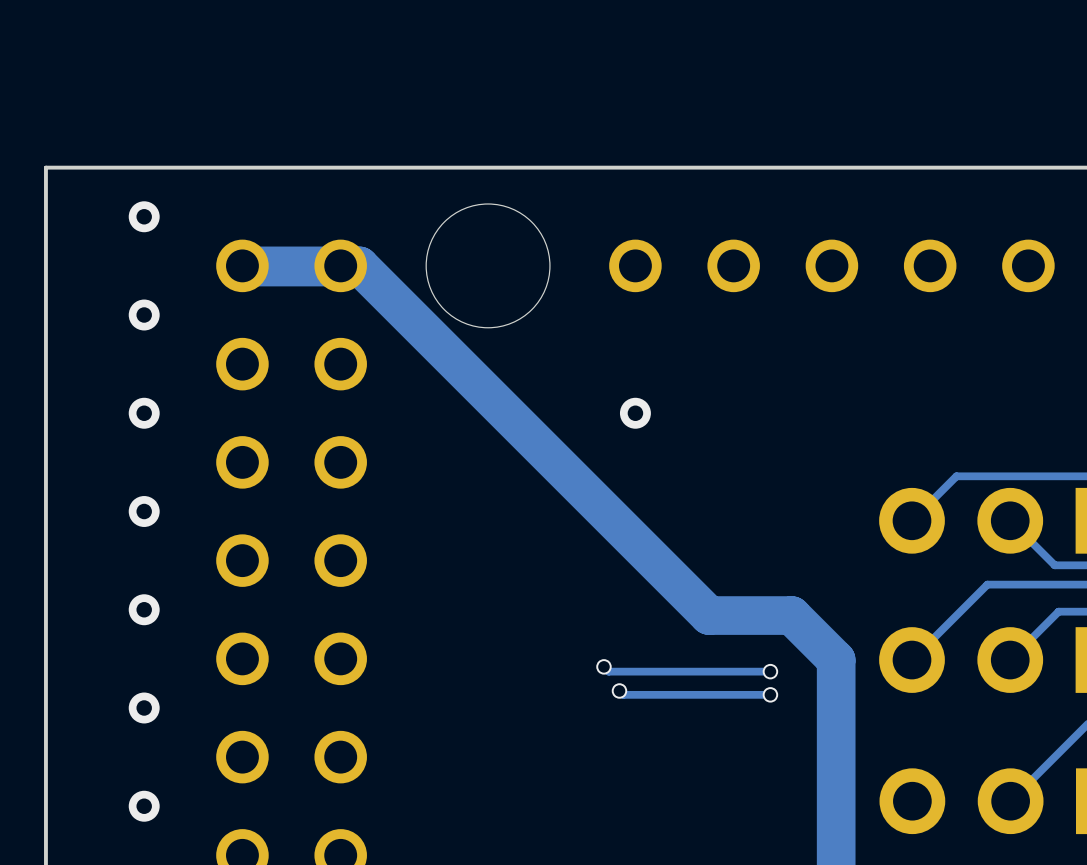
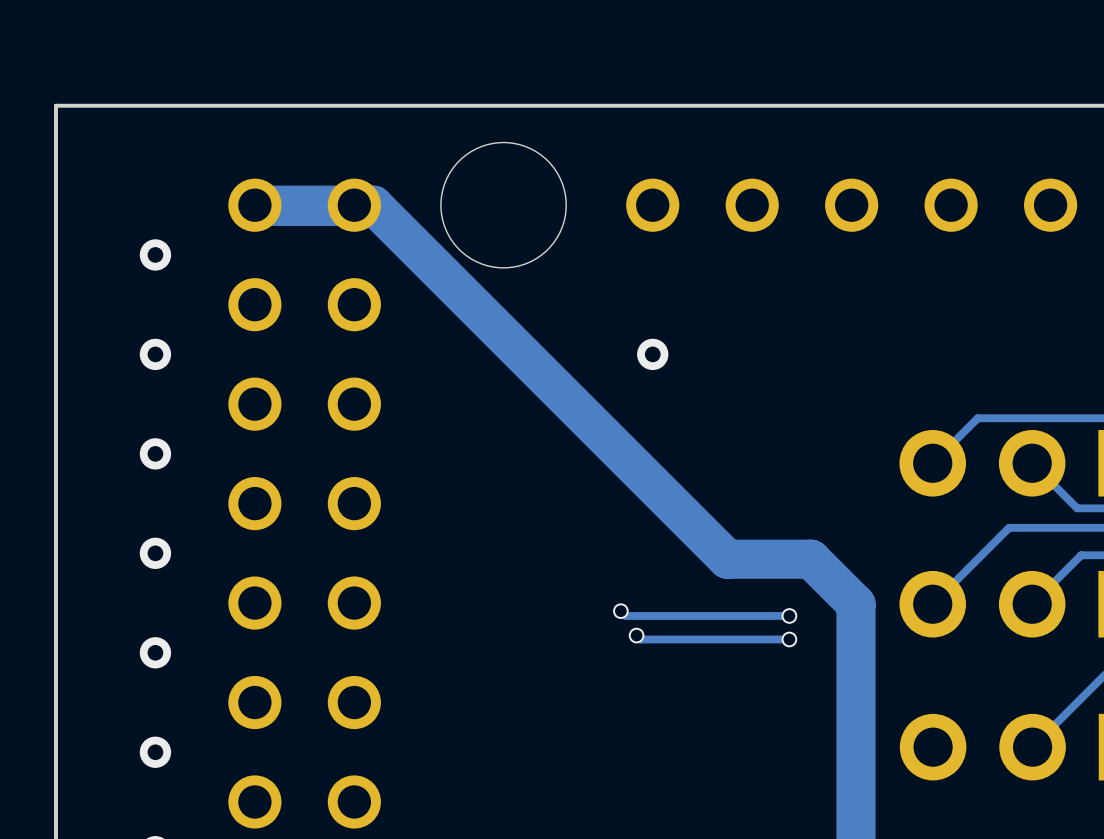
via: (144, 216) -> none

